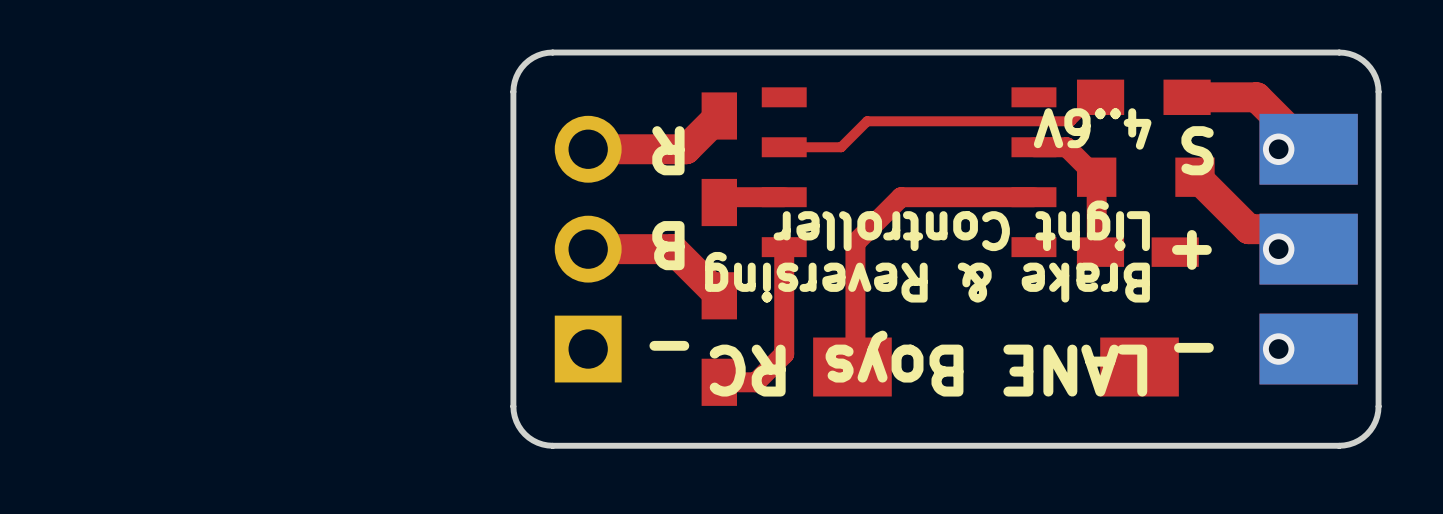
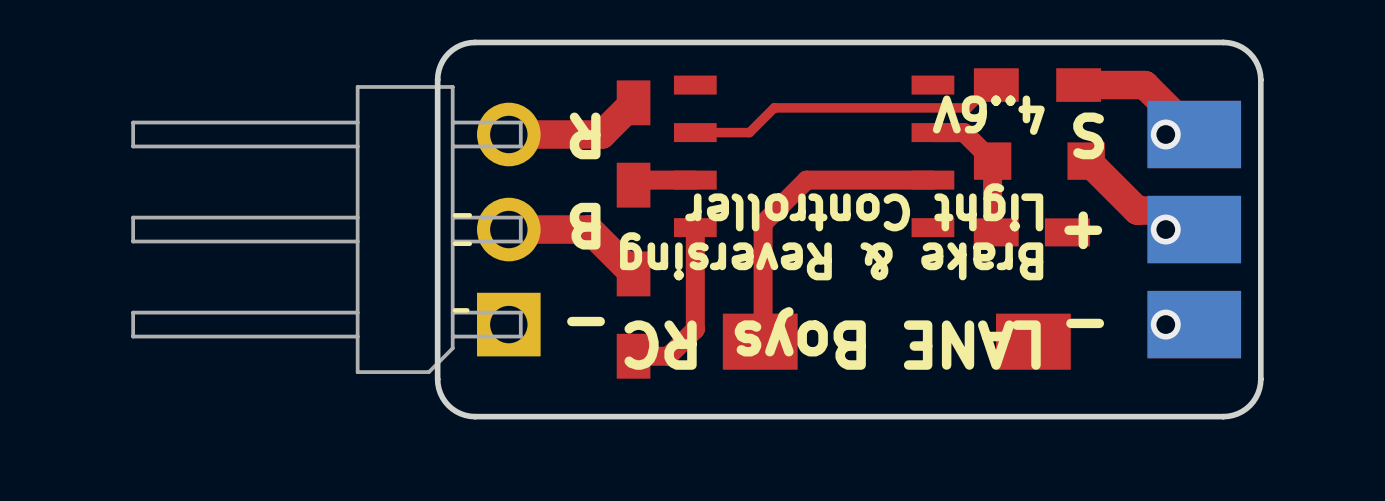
part side: top (588, 249) -> bottom (335, 229)

